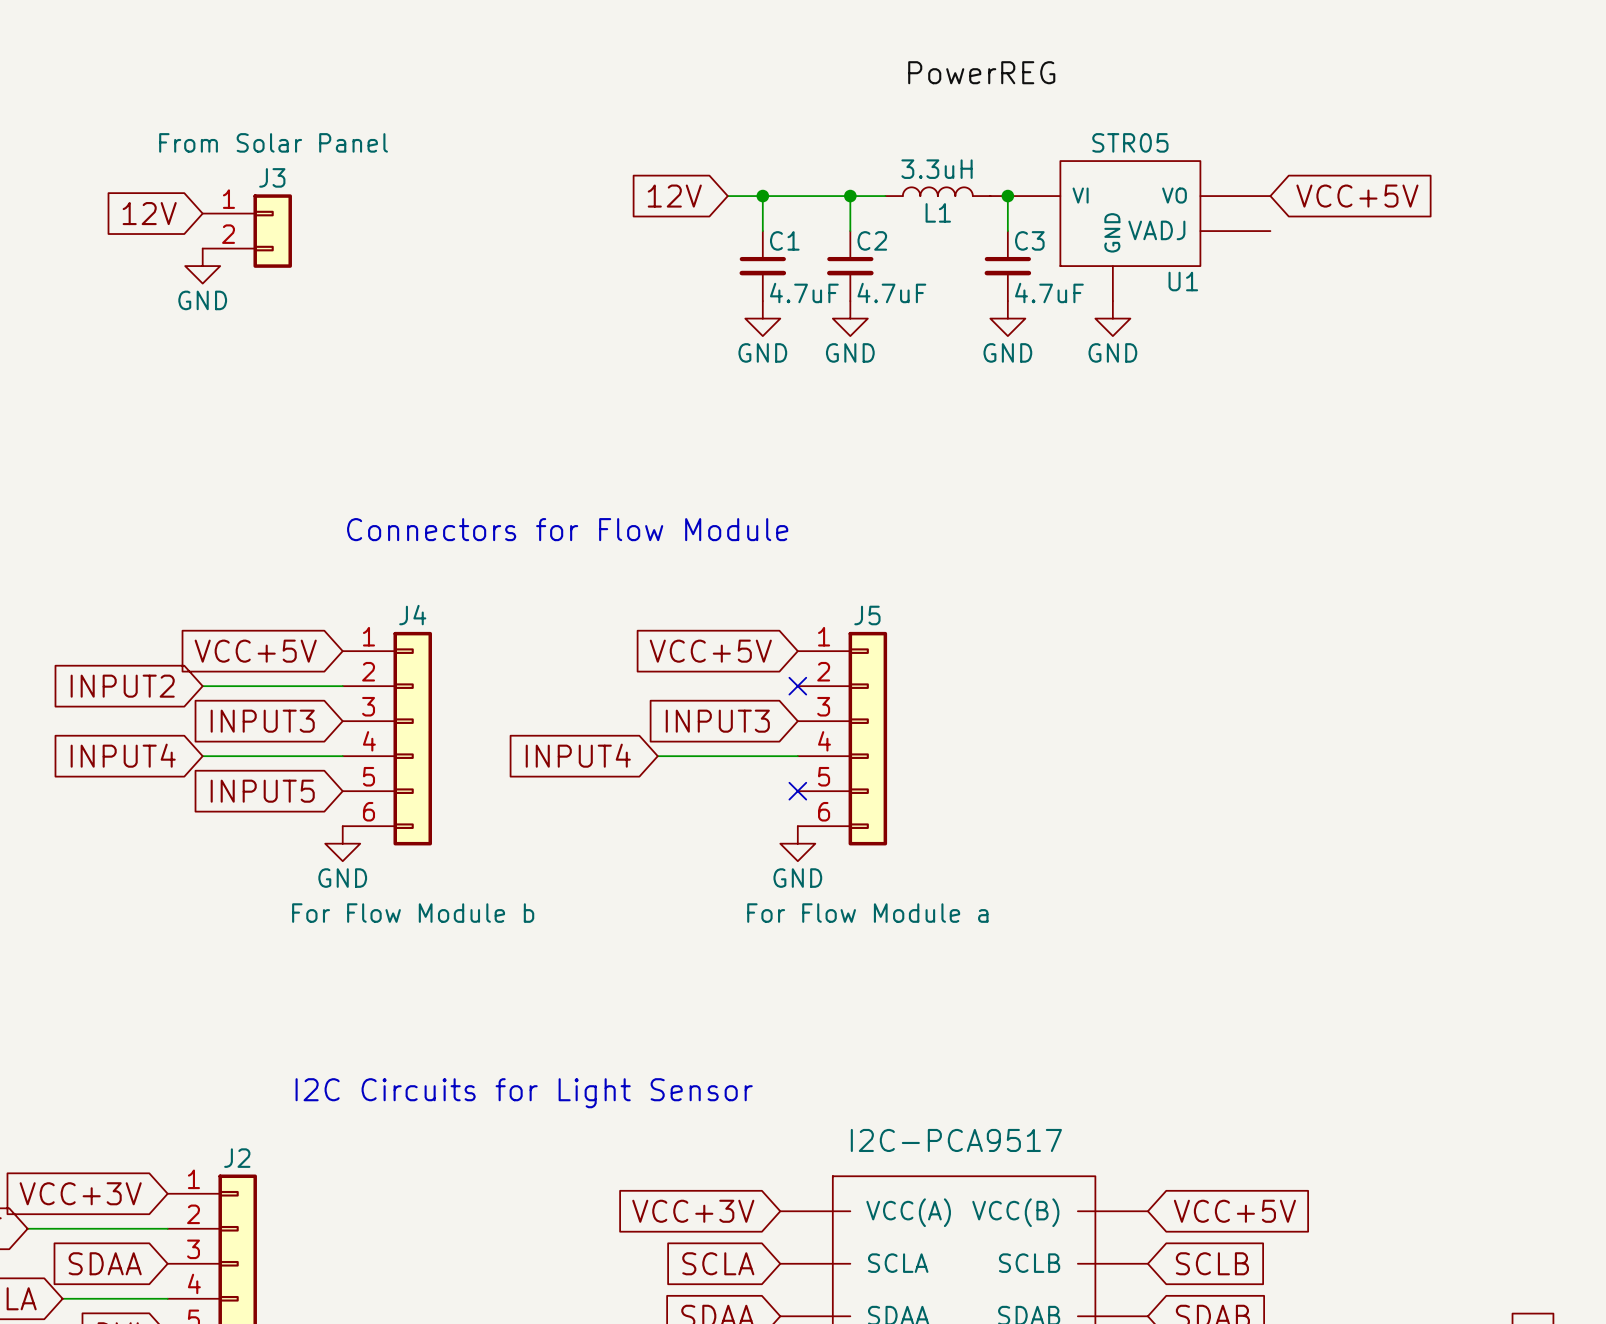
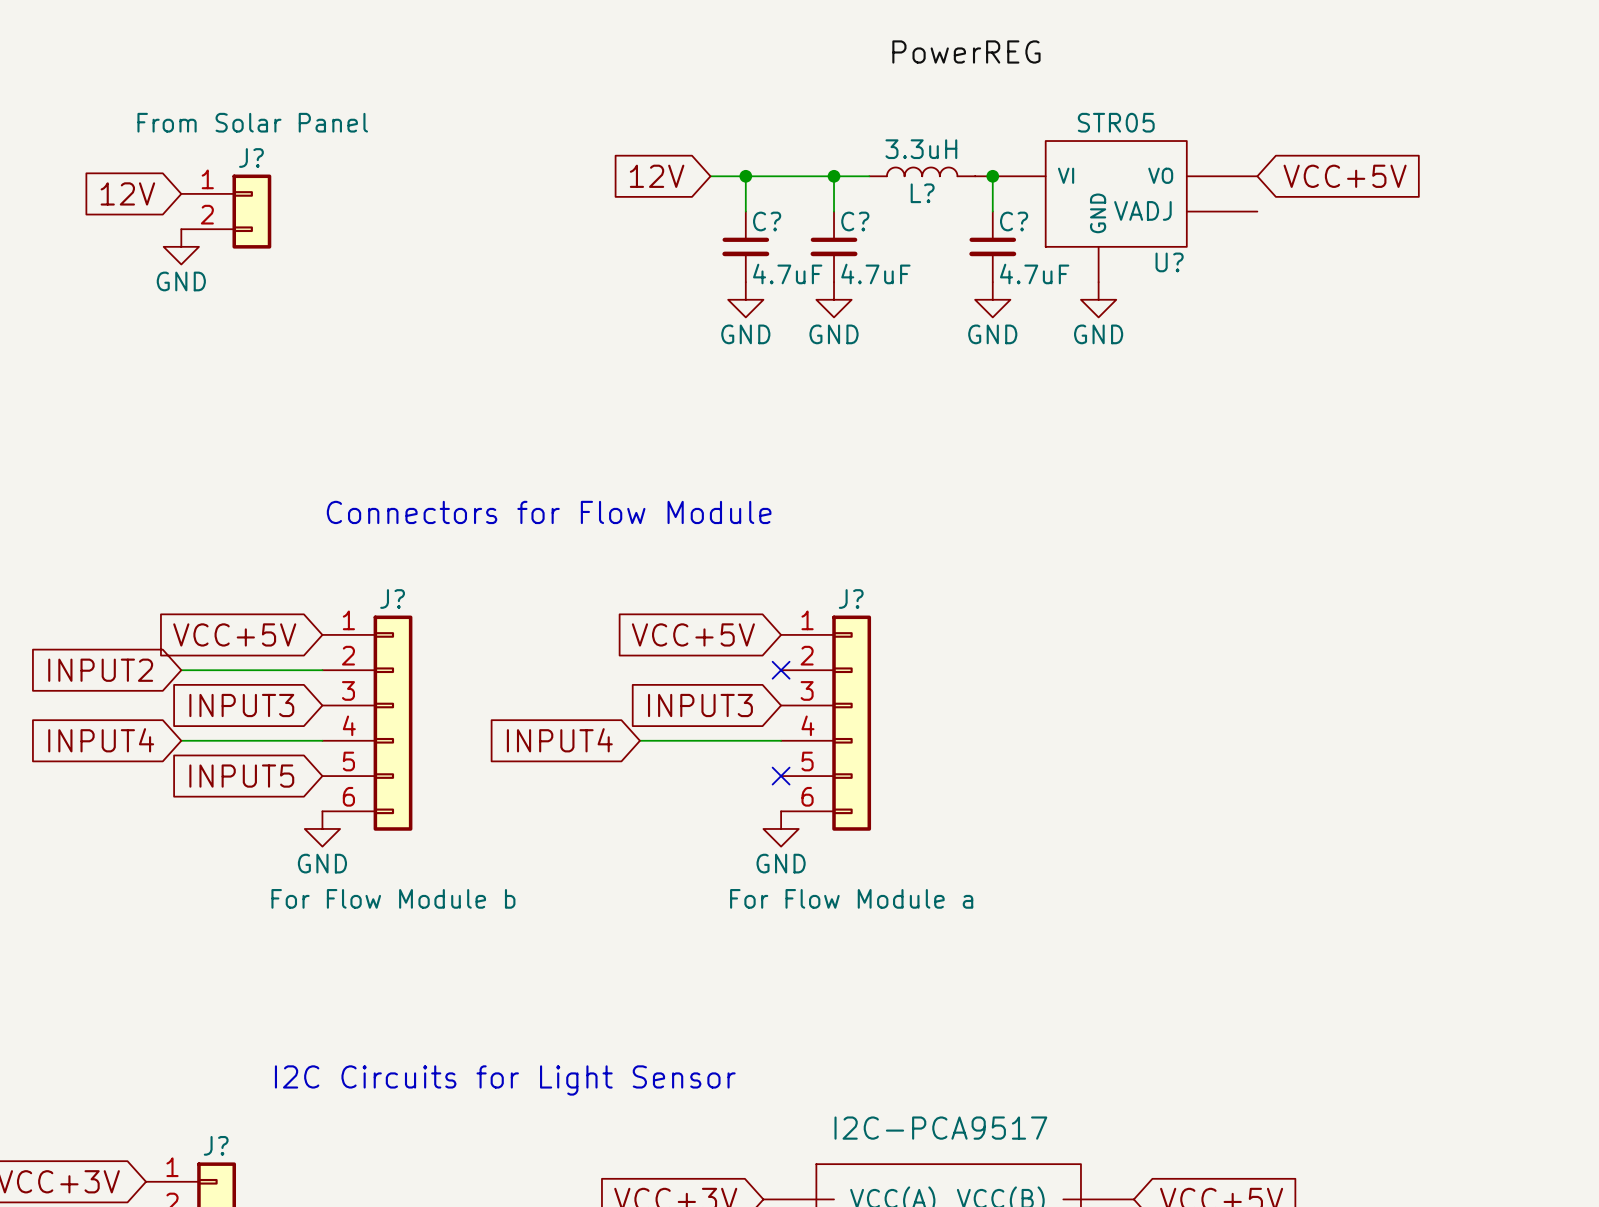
J3 name: J3 (272, 177) -> J? (251, 157)
L1 name: L1 (938, 212) -> L? (922, 193)
C1 name: C1 (784, 240) -> C? (767, 221)
C2 name: C2 (872, 240) -> C? (855, 221)
C3 name: C3 (1029, 240) -> C? (1014, 221)
U1 name: U1 (1183, 281) -> U? (1169, 262)
J4 name: J4 (412, 615) -> J? (392, 599)
J5 name: J5 (867, 615) -> J? (851, 599)
J2 name: J2 (237, 1158) -> J? (216, 1145)

